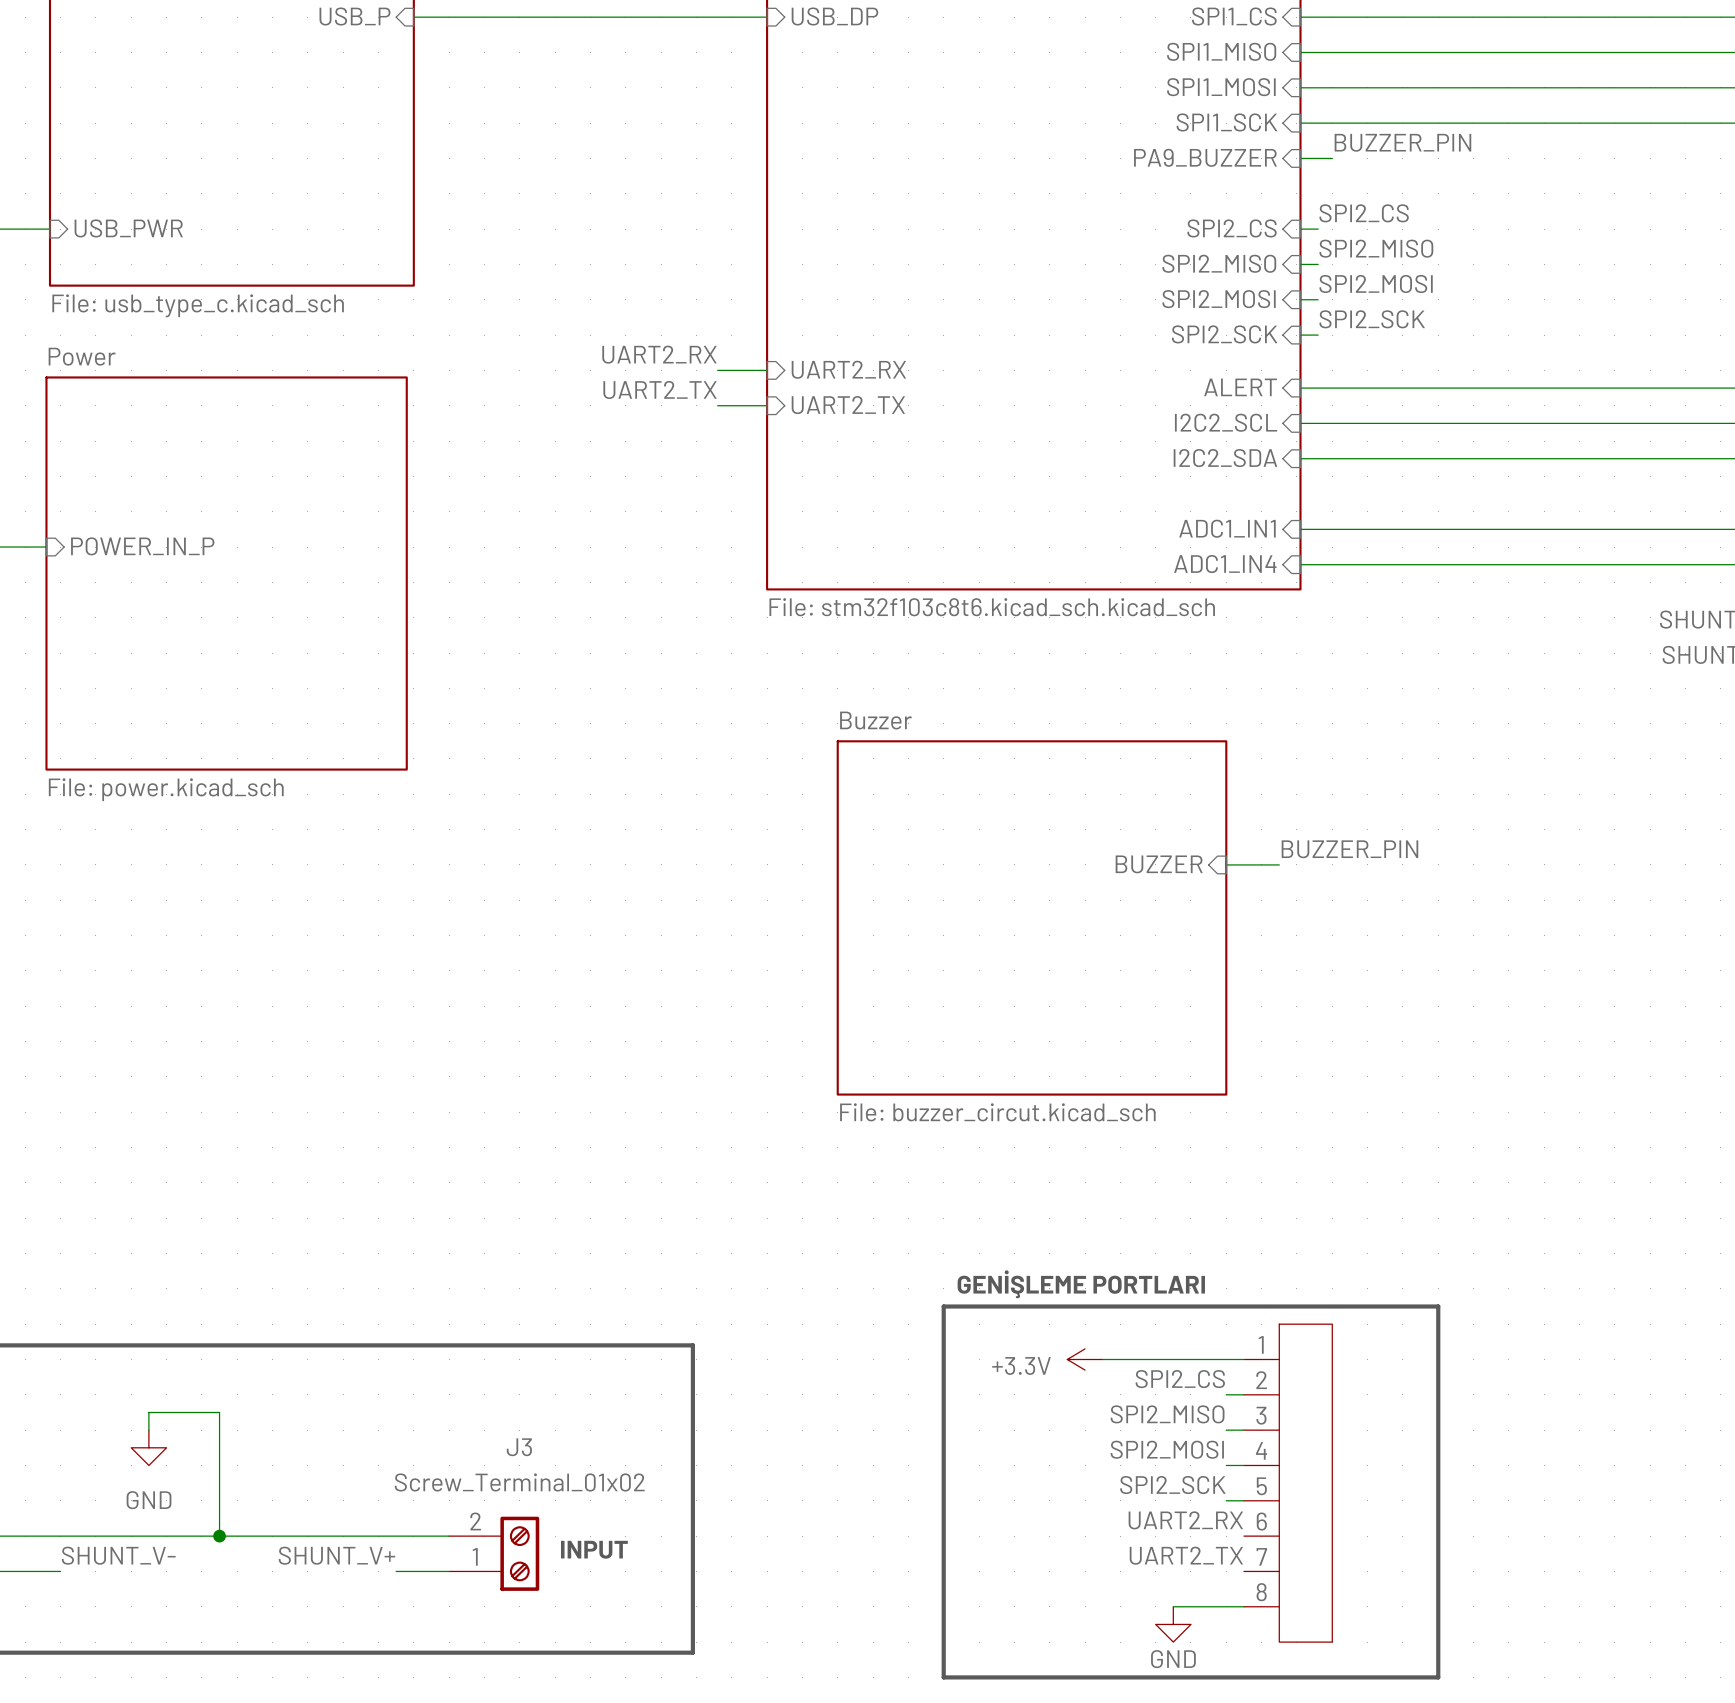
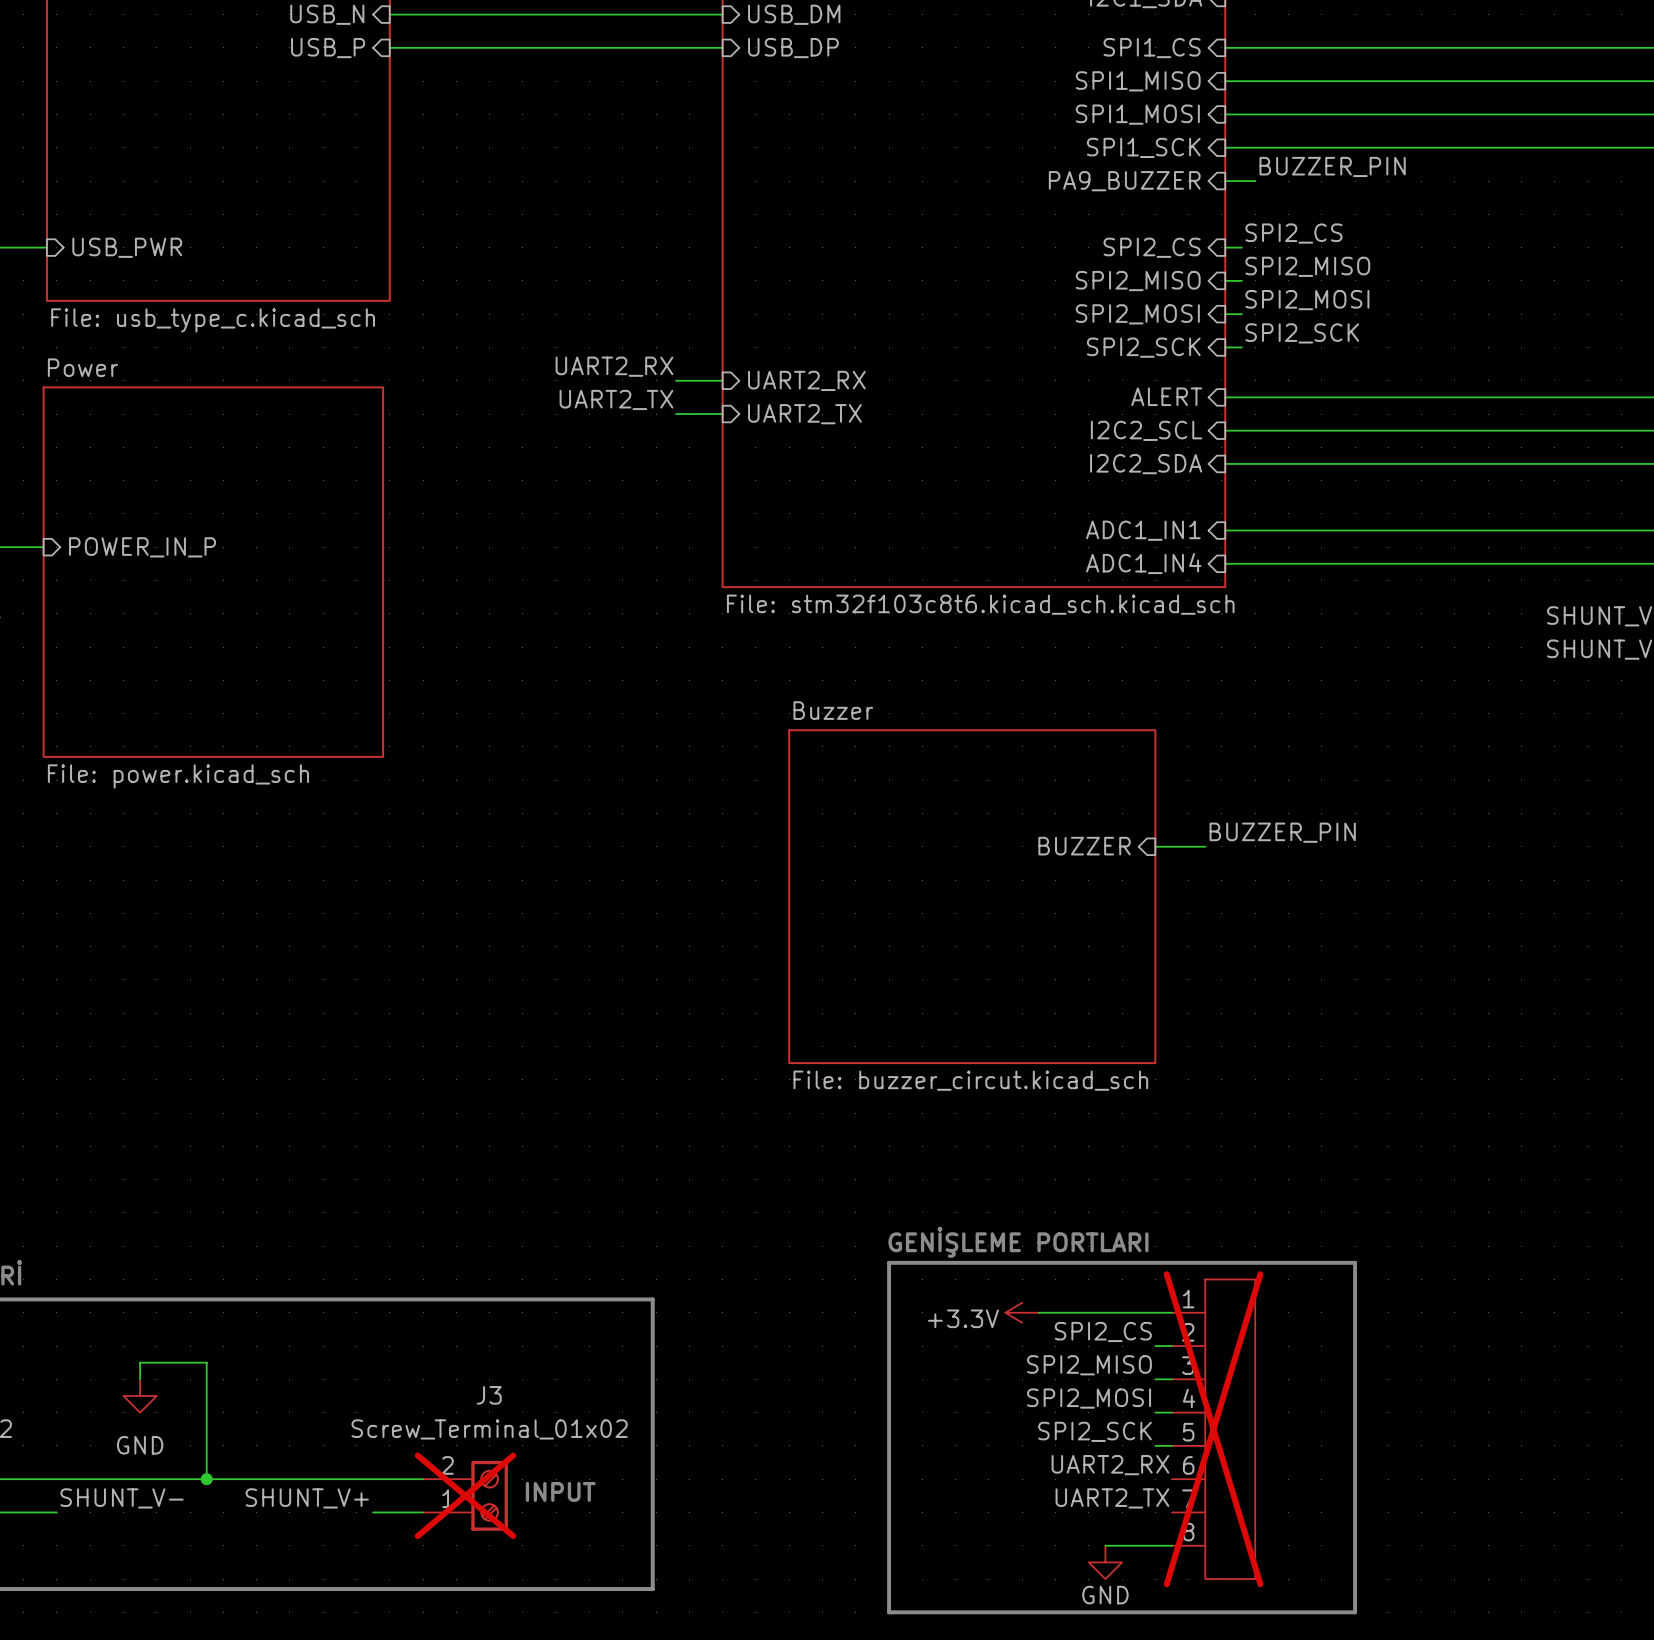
part do-not-place cross: none -> (1213, 1429)
J3 do-not-place cross: none -> (465, 1495)

